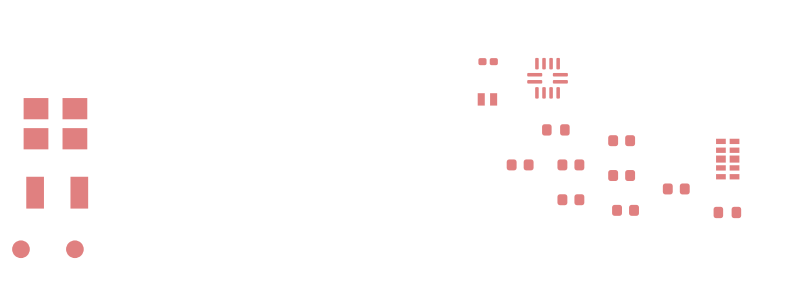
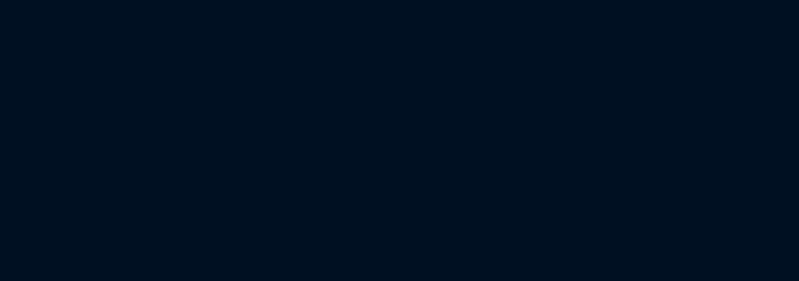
part: (488, 61) -> none
part: (547, 78) -> none
part: (487, 99) -> none
part: (55, 123) -> none
part: (555, 129) -> none
part: (621, 140) -> none
part: (727, 159) -> none
part: (520, 164) -> none
part: (570, 164) -> none
part: (621, 175) -> none
part: (676, 188) -> none
part: (57, 192) -> none
part: (570, 199) -> none
part: (625, 210) -> none
part: (727, 212) -> none
part: (20, 249) -> none
part: (74, 249) -> none

